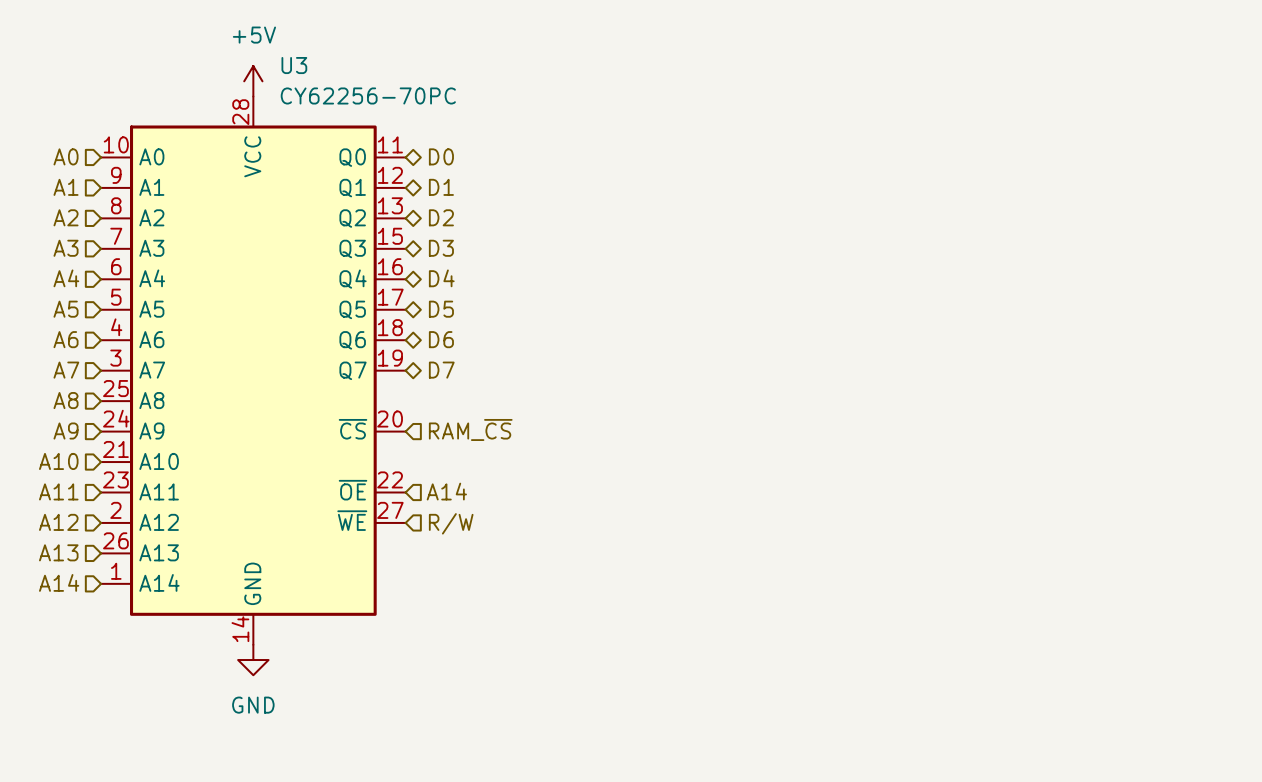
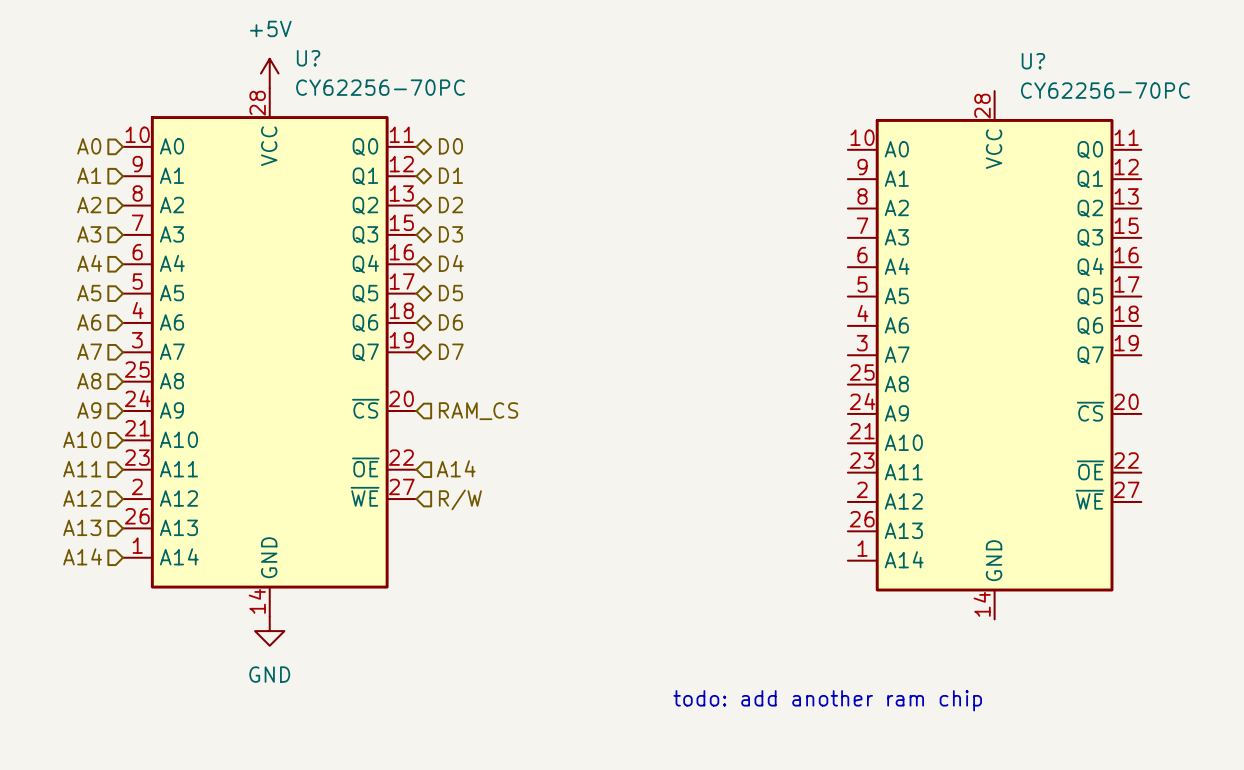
U3 name: U3 (294, 65) -> U? (308, 58)
U?: none -> CY62256-70PC (994, 355)
hierarchical label: RAM_~{CS} (470, 429) -> RAM_CS (478, 411)
text: none -> todo: add another ram chip (827, 700)

